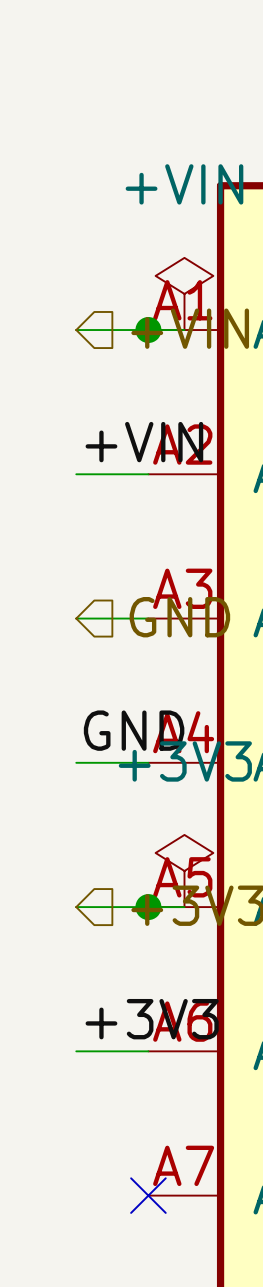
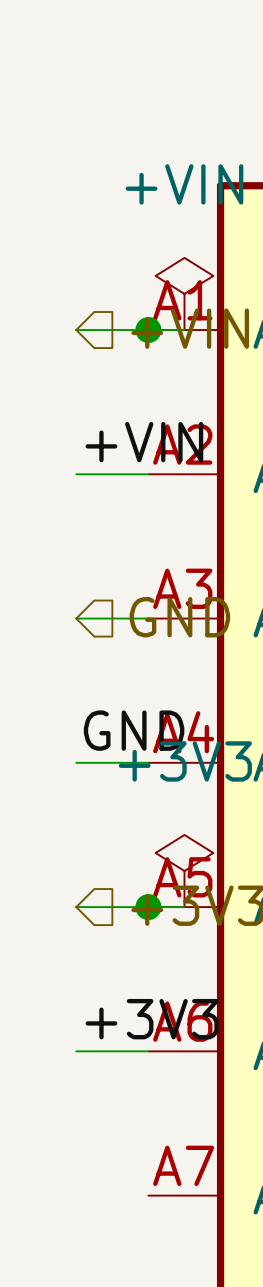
no-connect mark: (148, 1195) -> none

